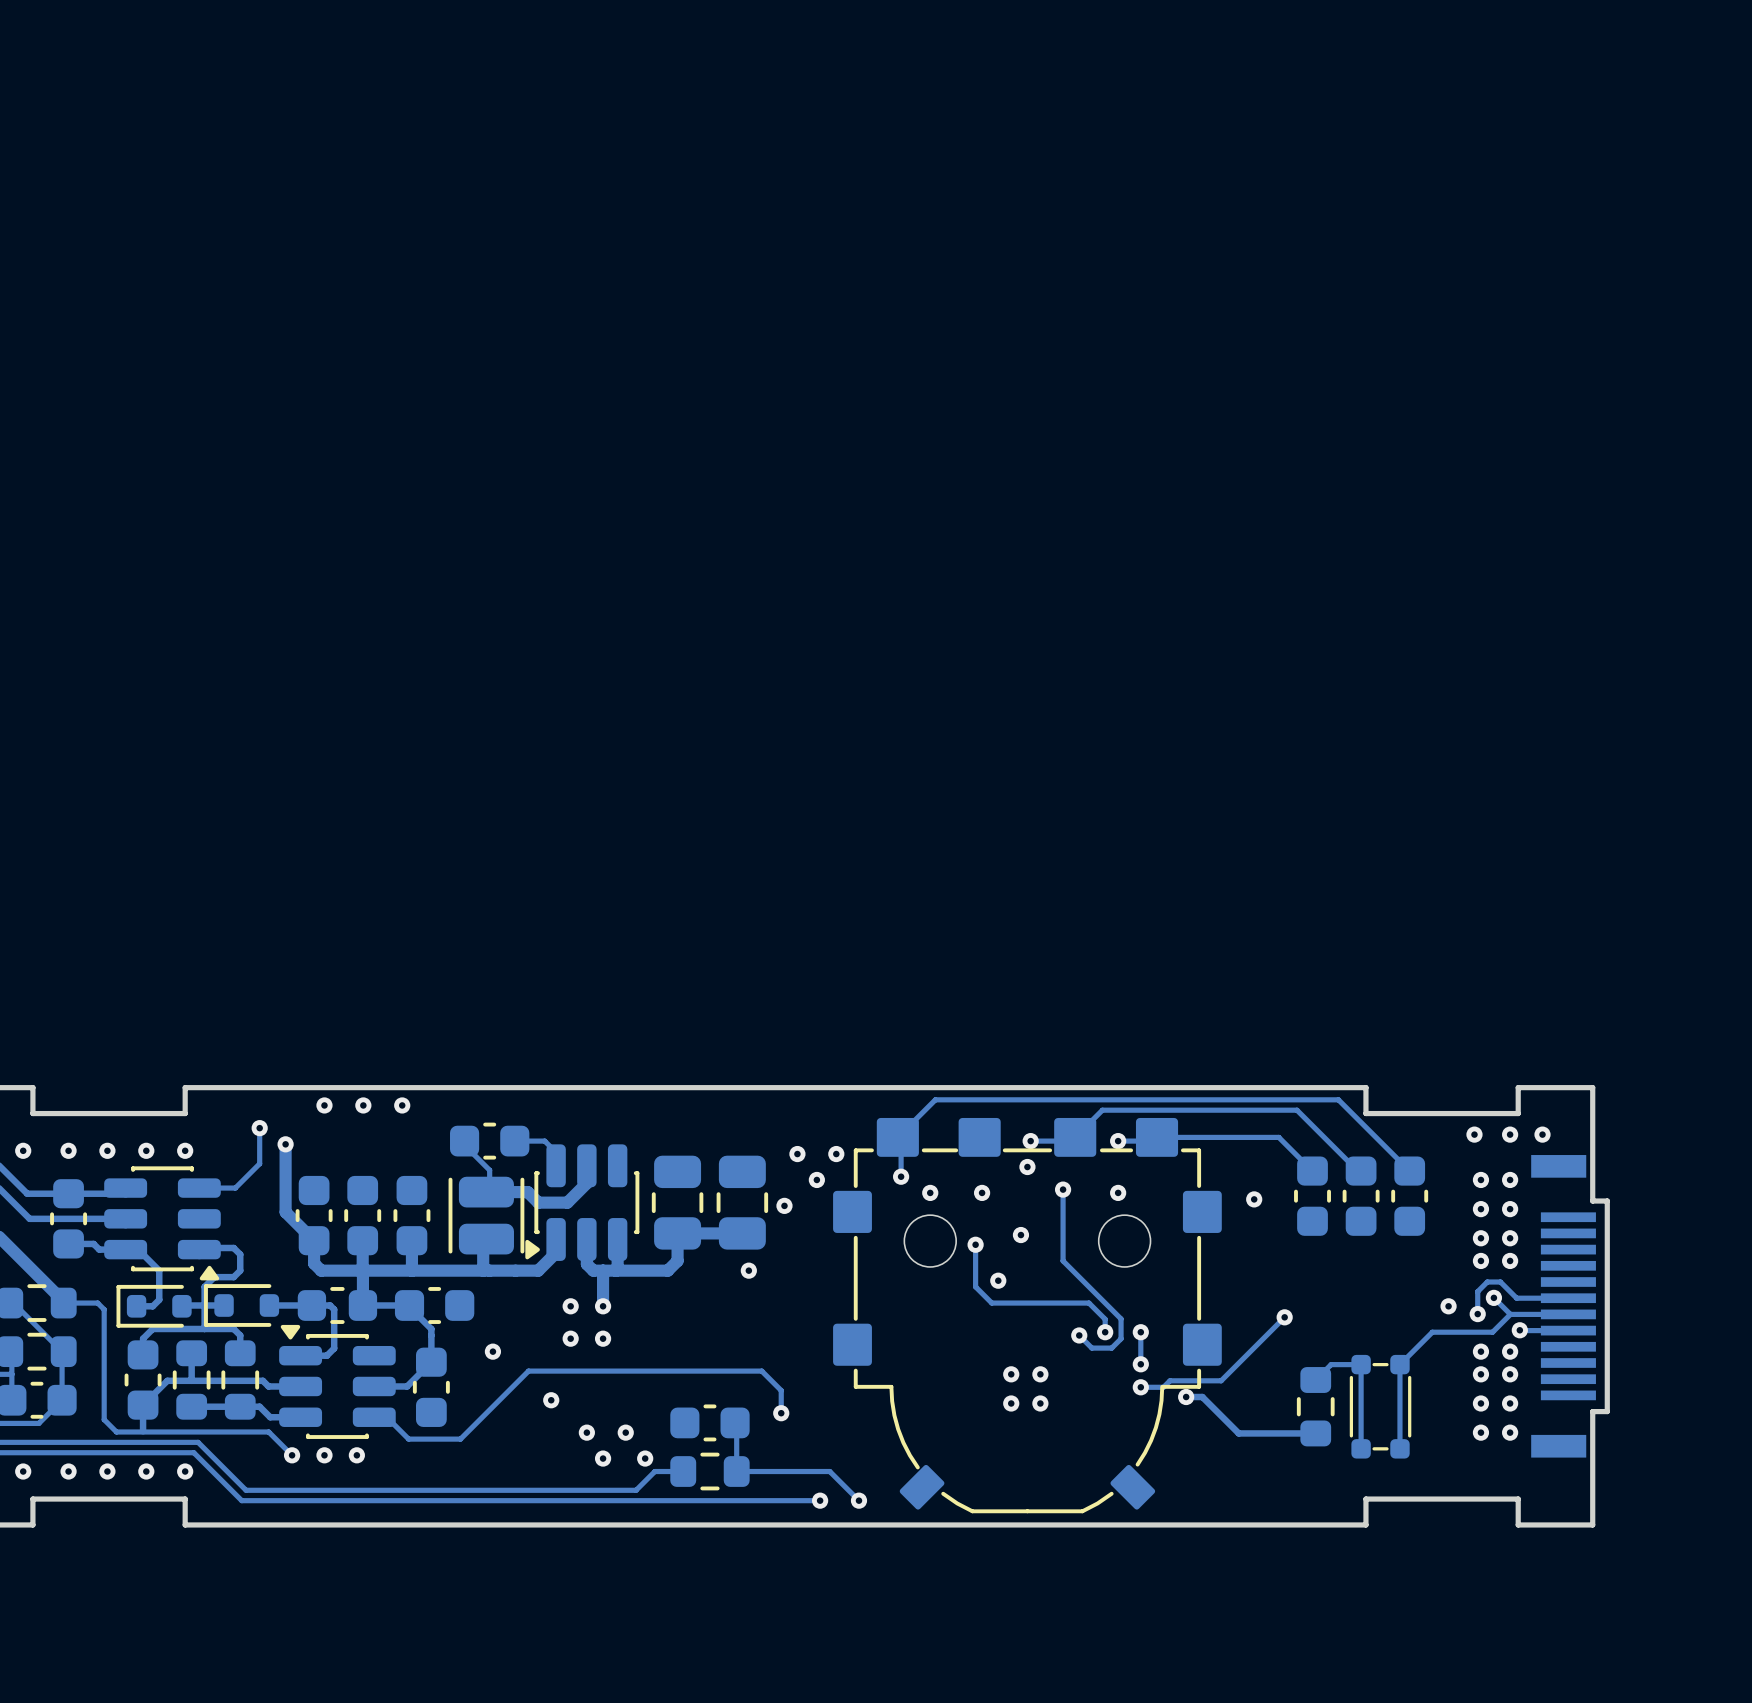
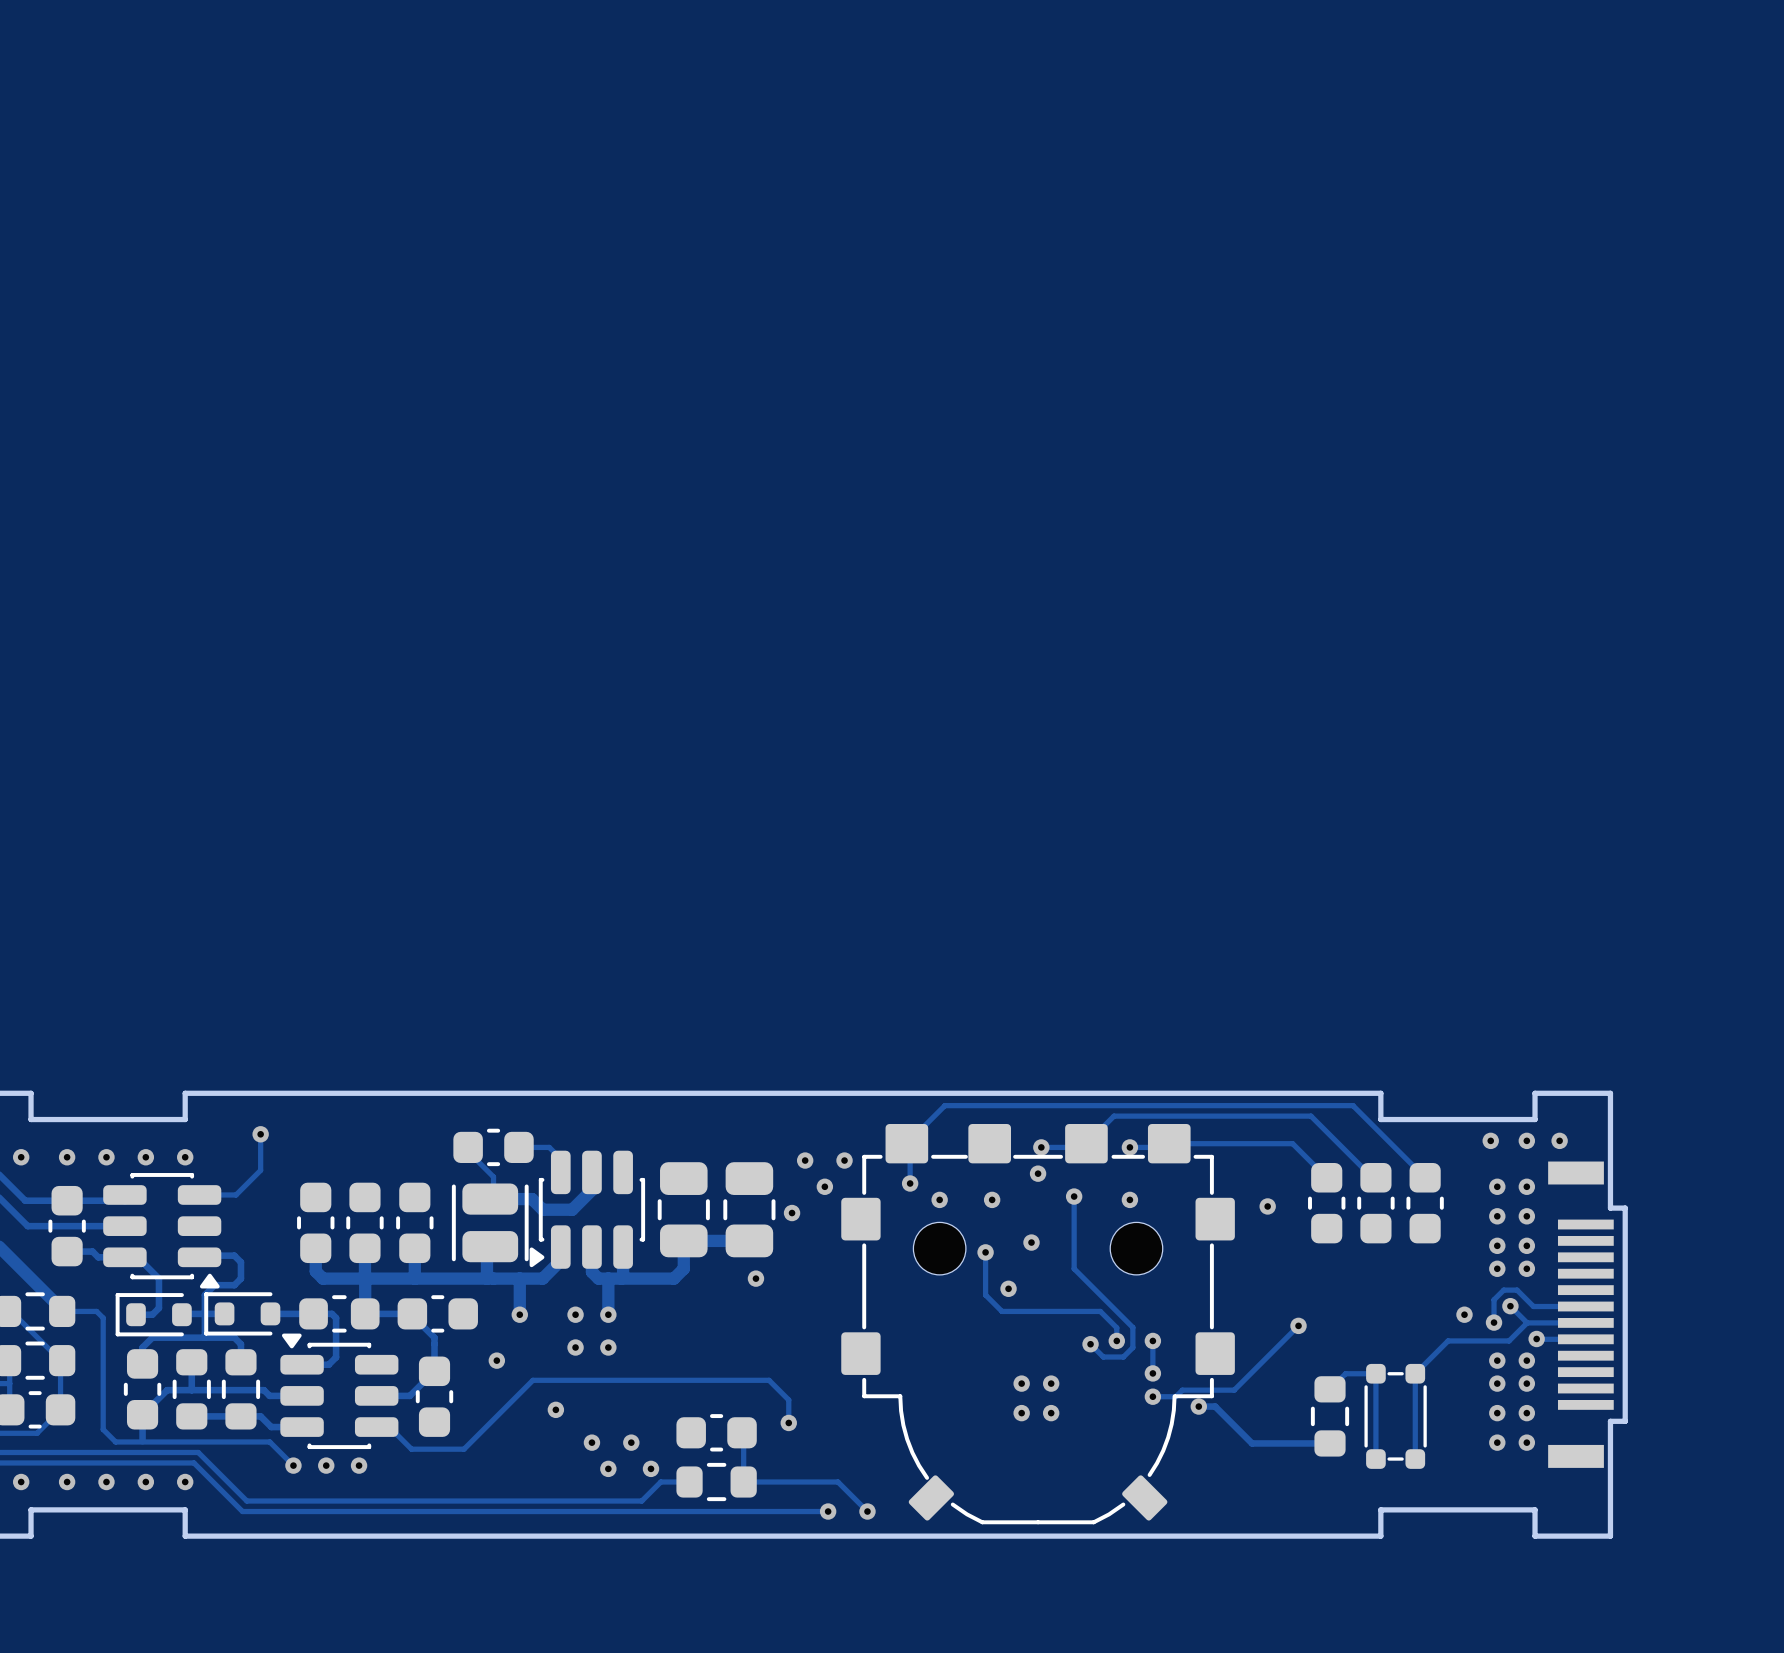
via: (324, 1105) -> none
via: (363, 1105) -> none
via: (402, 1105) -> none
track: (285, 1144) (285, 1212) (314, 1240) -> none
via: (285, 1144) -> none
track: none -> (519, 1278) (519, 1314)
via: none -> (519, 1314)

